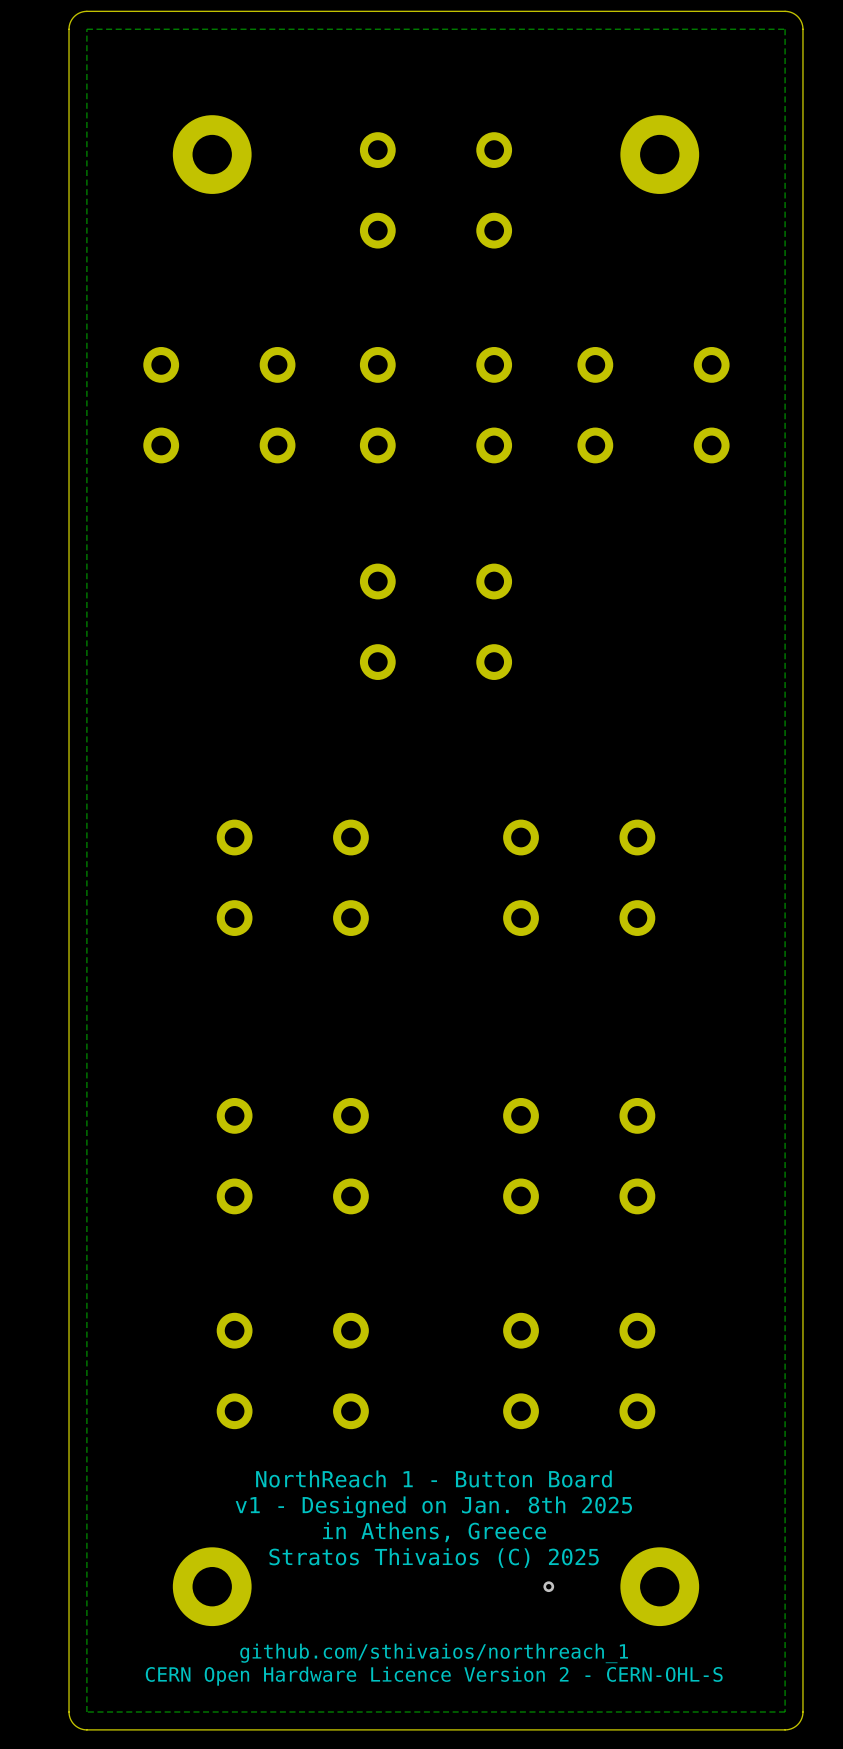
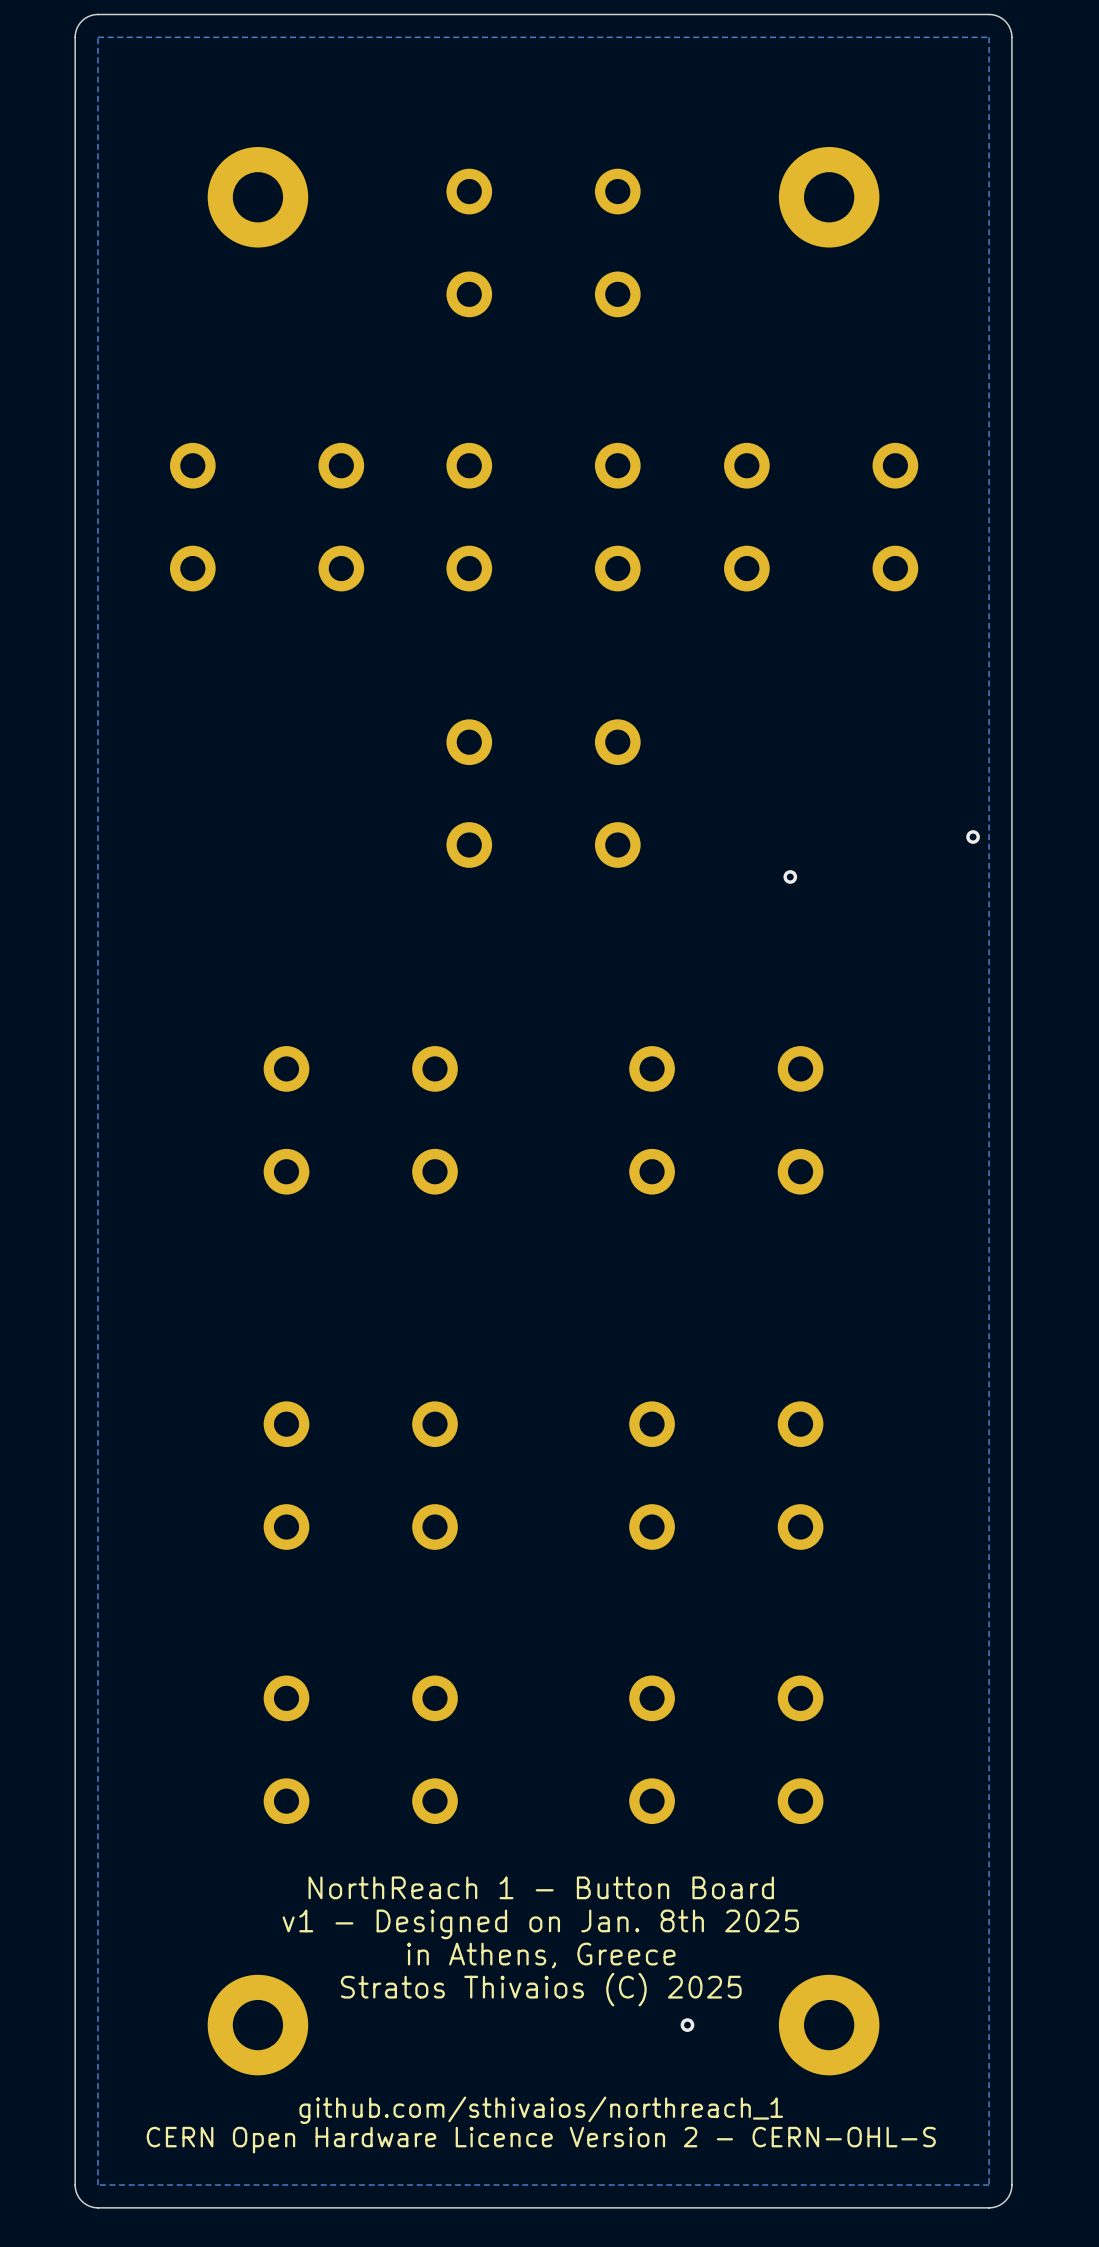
via: none -> (973, 837)
via: none -> (790, 876)

